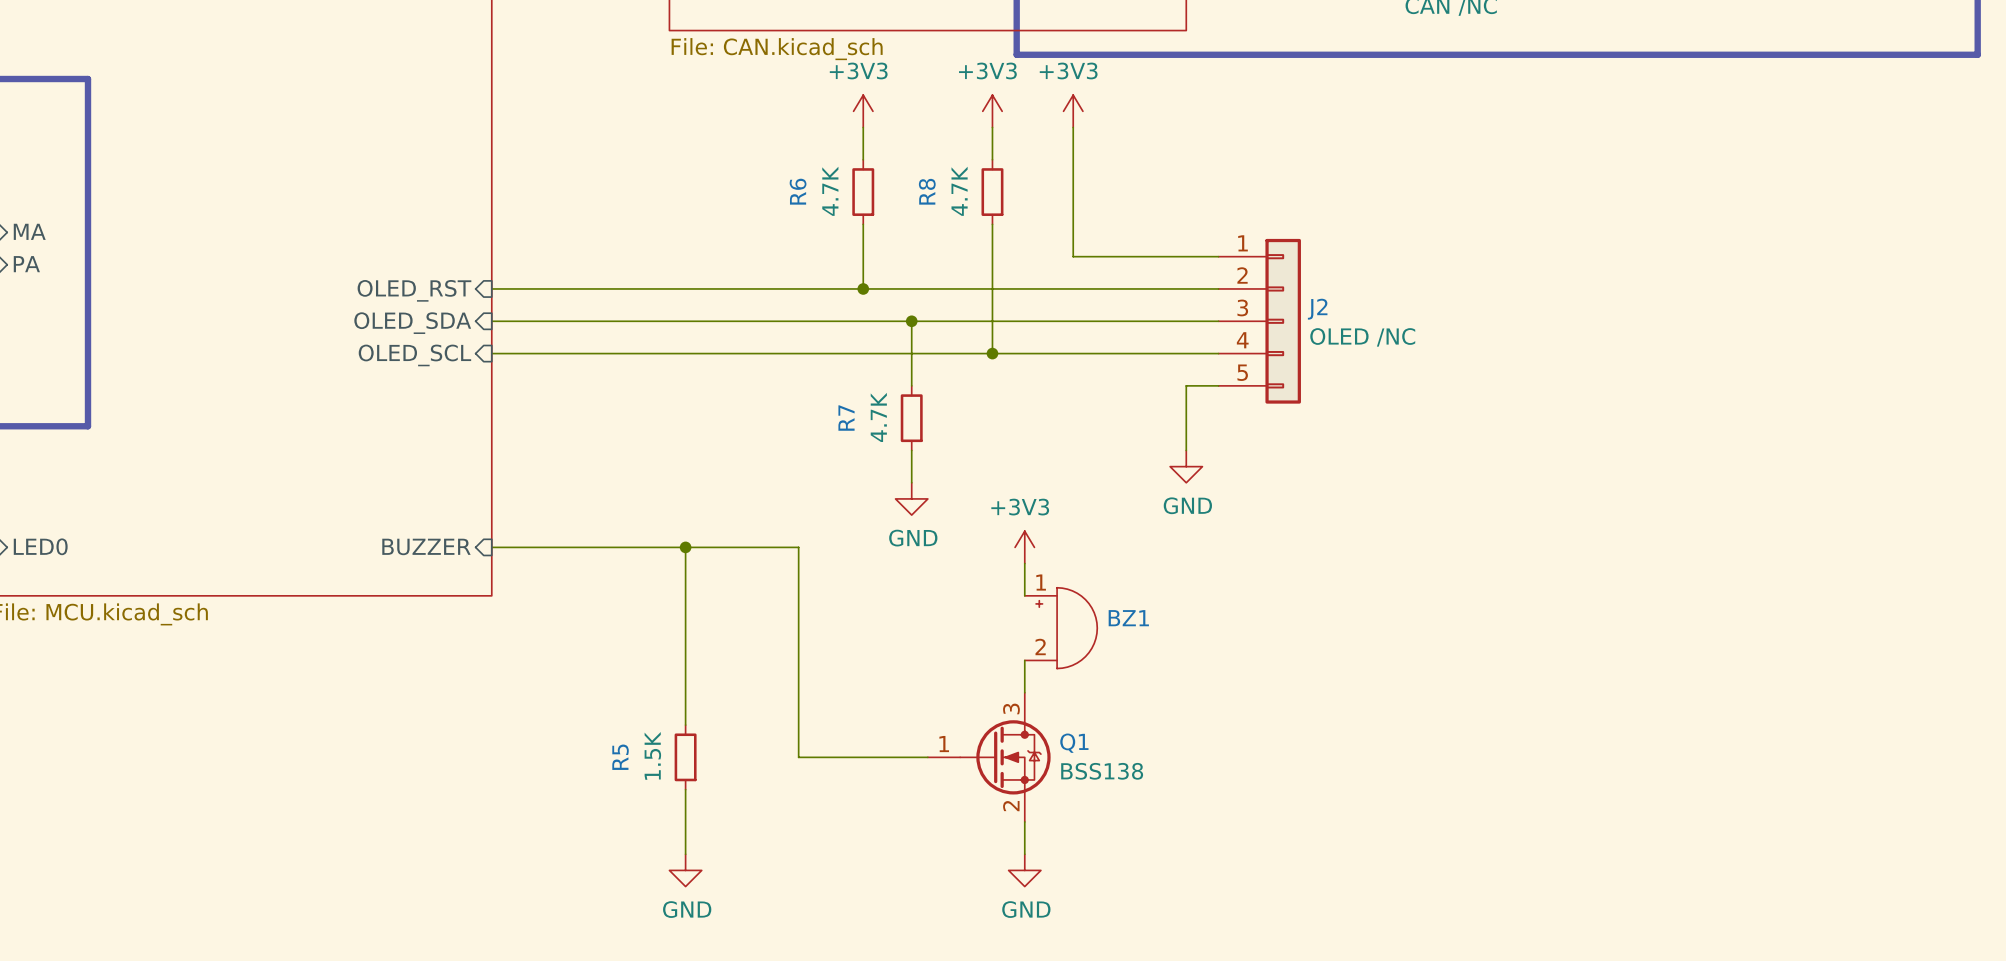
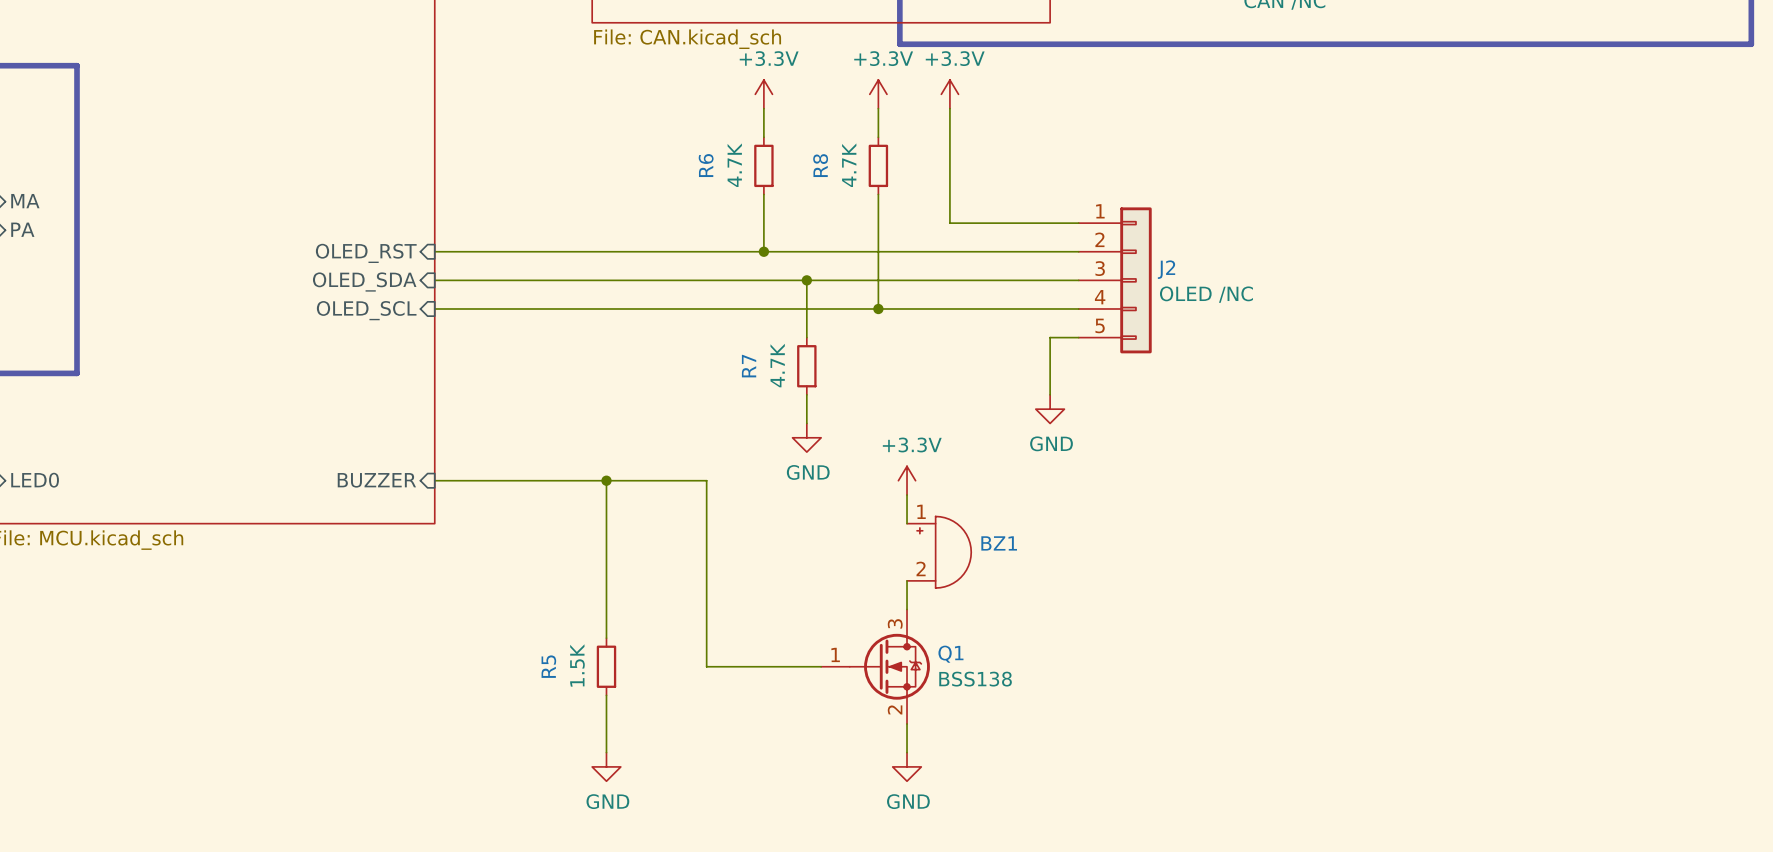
power symbol: +3V3 (863, 111) -> +3.3V (763, 94)
power symbol: +3V3 (992, 111) -> +3.3V (878, 94)
power symbol: +3V3 (1073, 111) -> +3.3V (949, 94)
power symbol: +3V3 (1024, 547) -> +3.3V (907, 480)

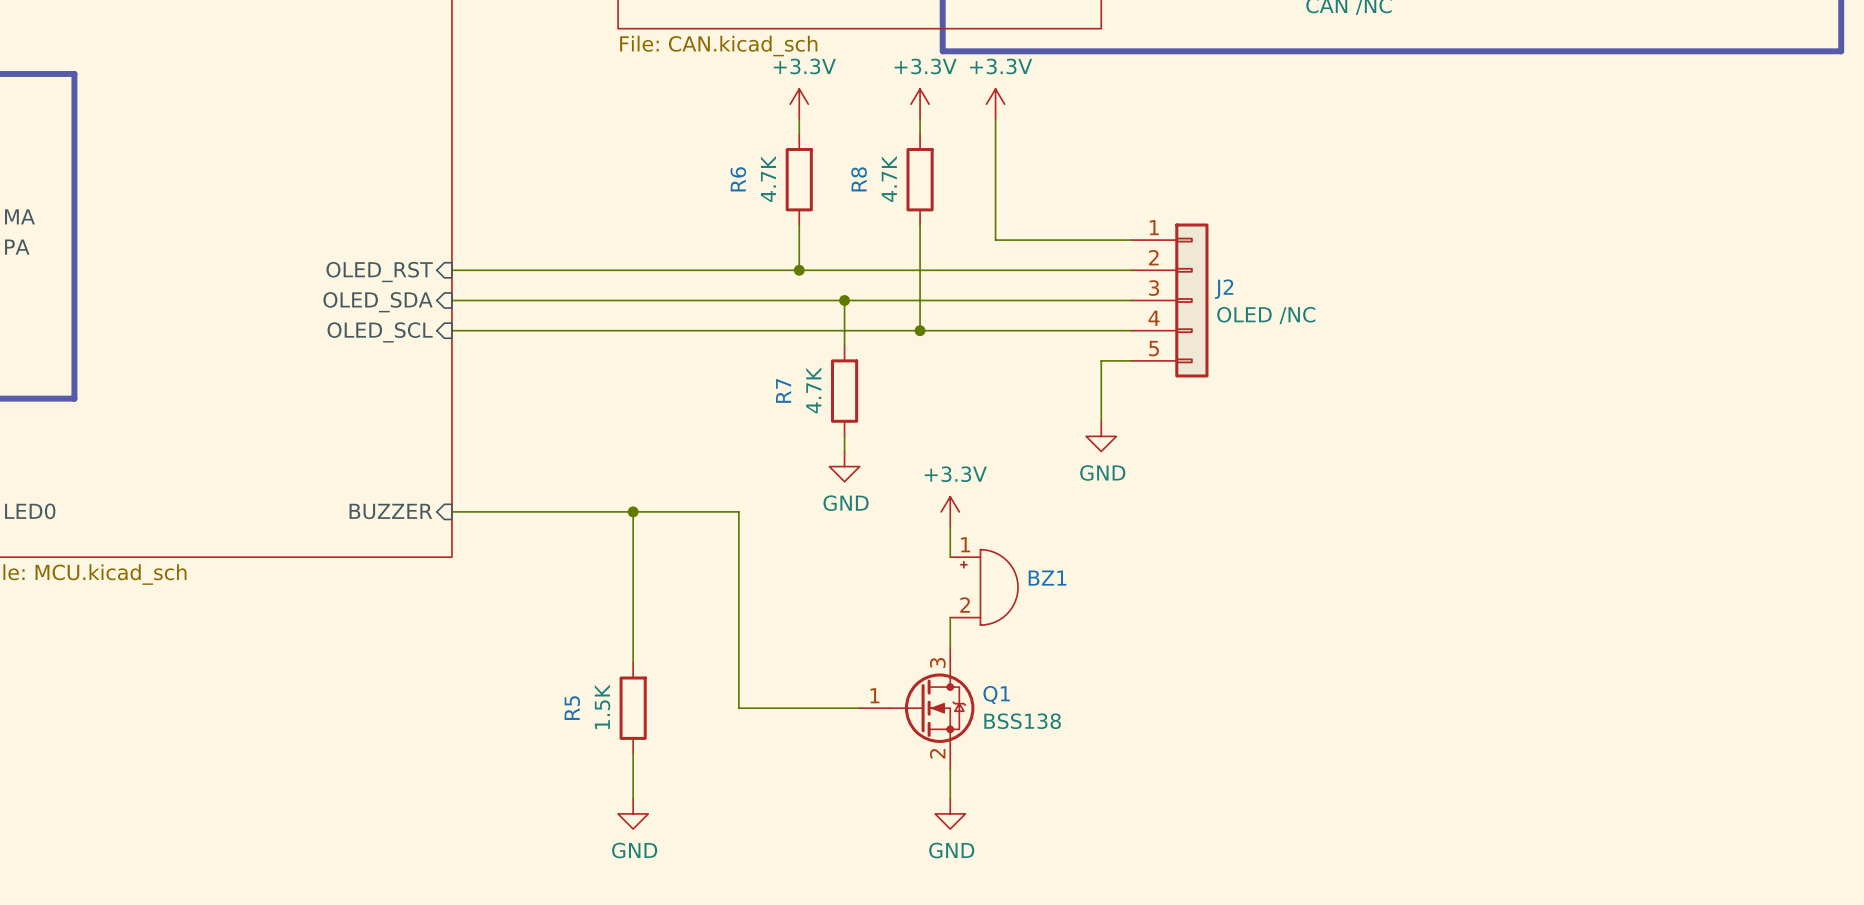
R6 symbol: [754, 137, 774, 195] -> [785, 134, 813, 225]
R8 symbol: [868, 137, 889, 195] -> [906, 134, 934, 225]
R7 symbol: [797, 337, 817, 395] -> [830, 345, 859, 437]
R5 symbol: [596, 638, 617, 696] -> [619, 662, 647, 754]

